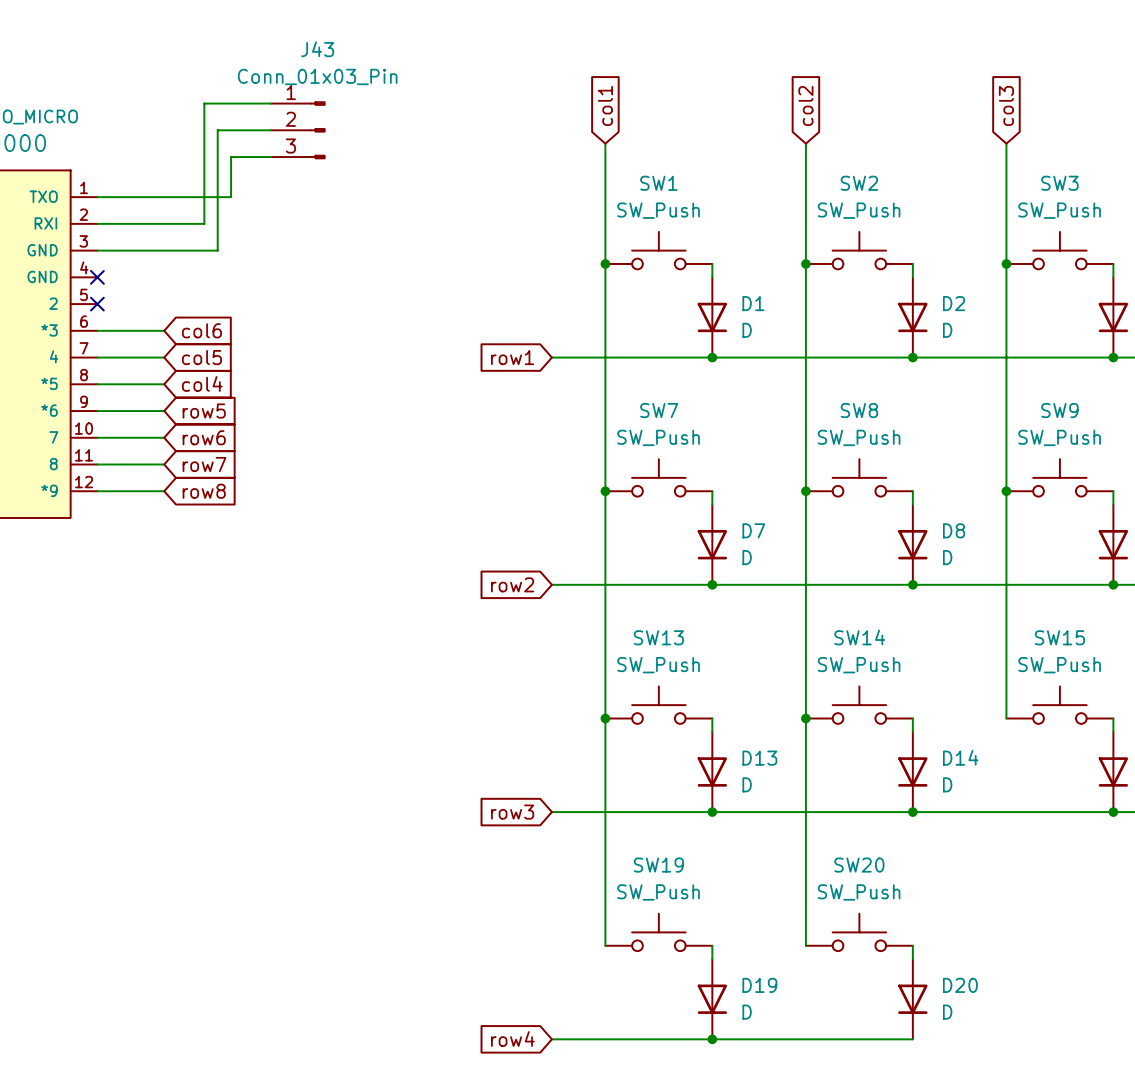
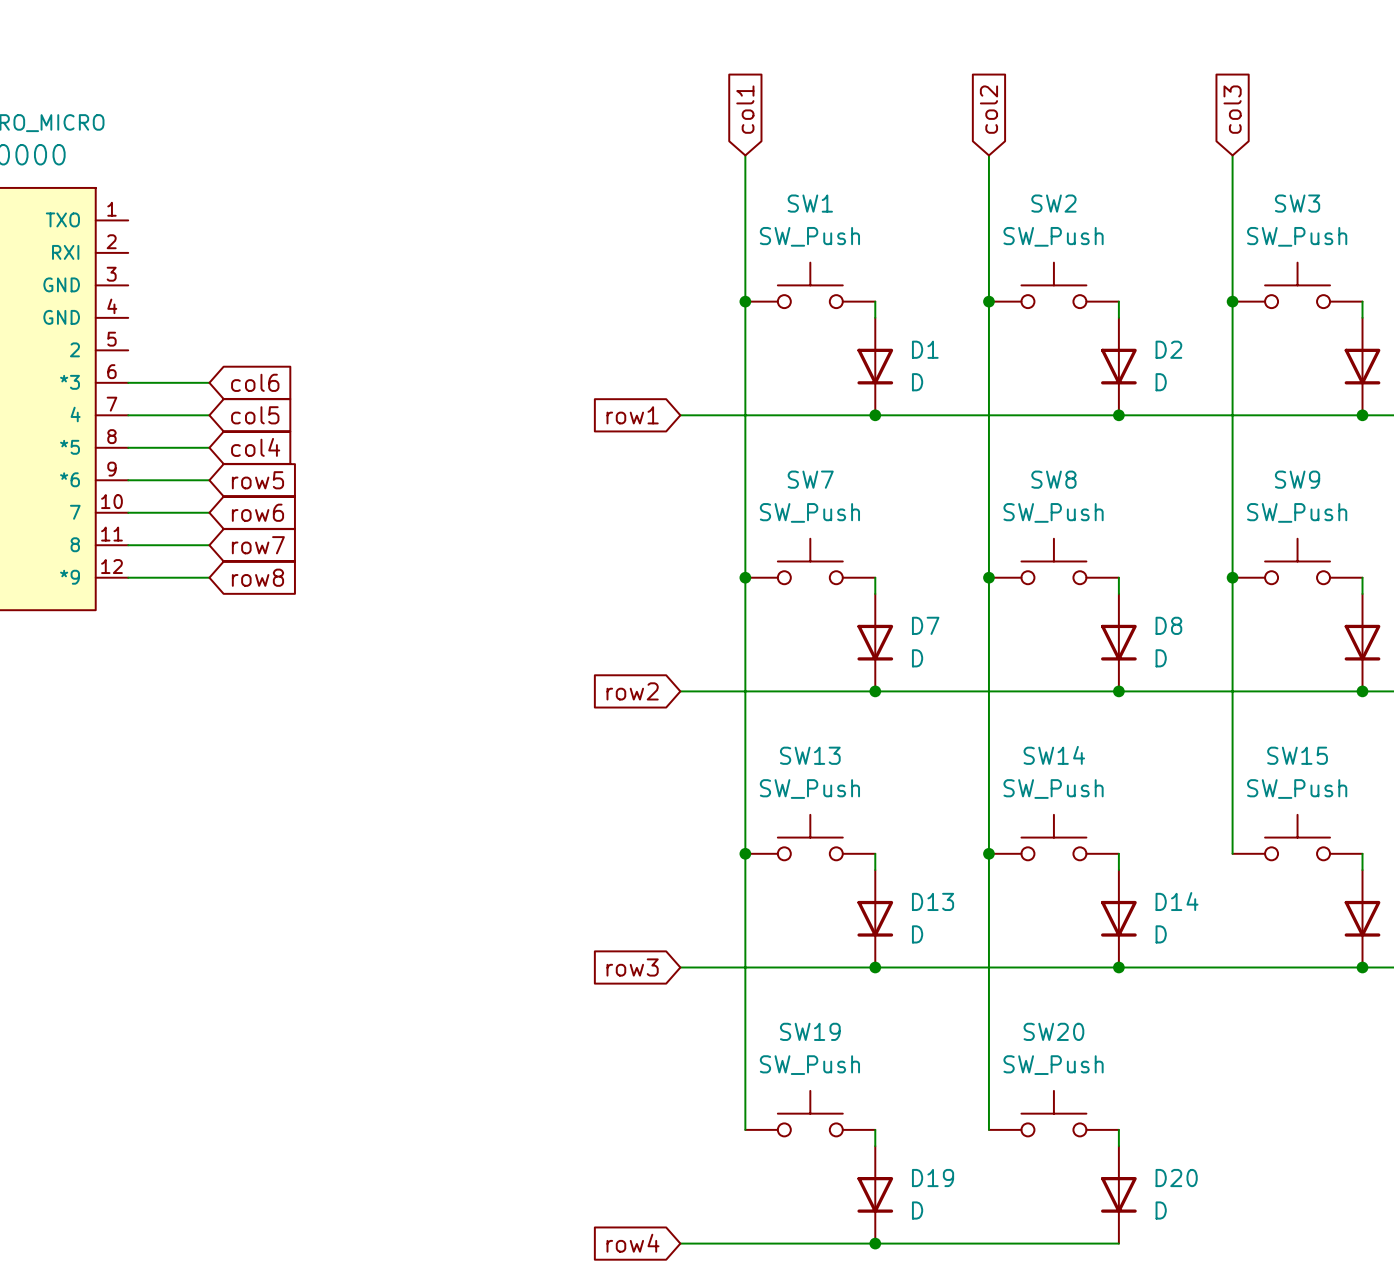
wire: (271, 103) (204, 103) (204, 223) (97, 223) -> none
wire: (271, 130) (217, 130) (217, 250) (97, 250) -> none
J43: Conn_01x03_Pin (298, 130) -> none
wire: (271, 157) (231, 157) (231, 197) (97, 197) -> none
no-connect mark: (97, 277) -> none
no-connect mark: (97, 304) -> none

